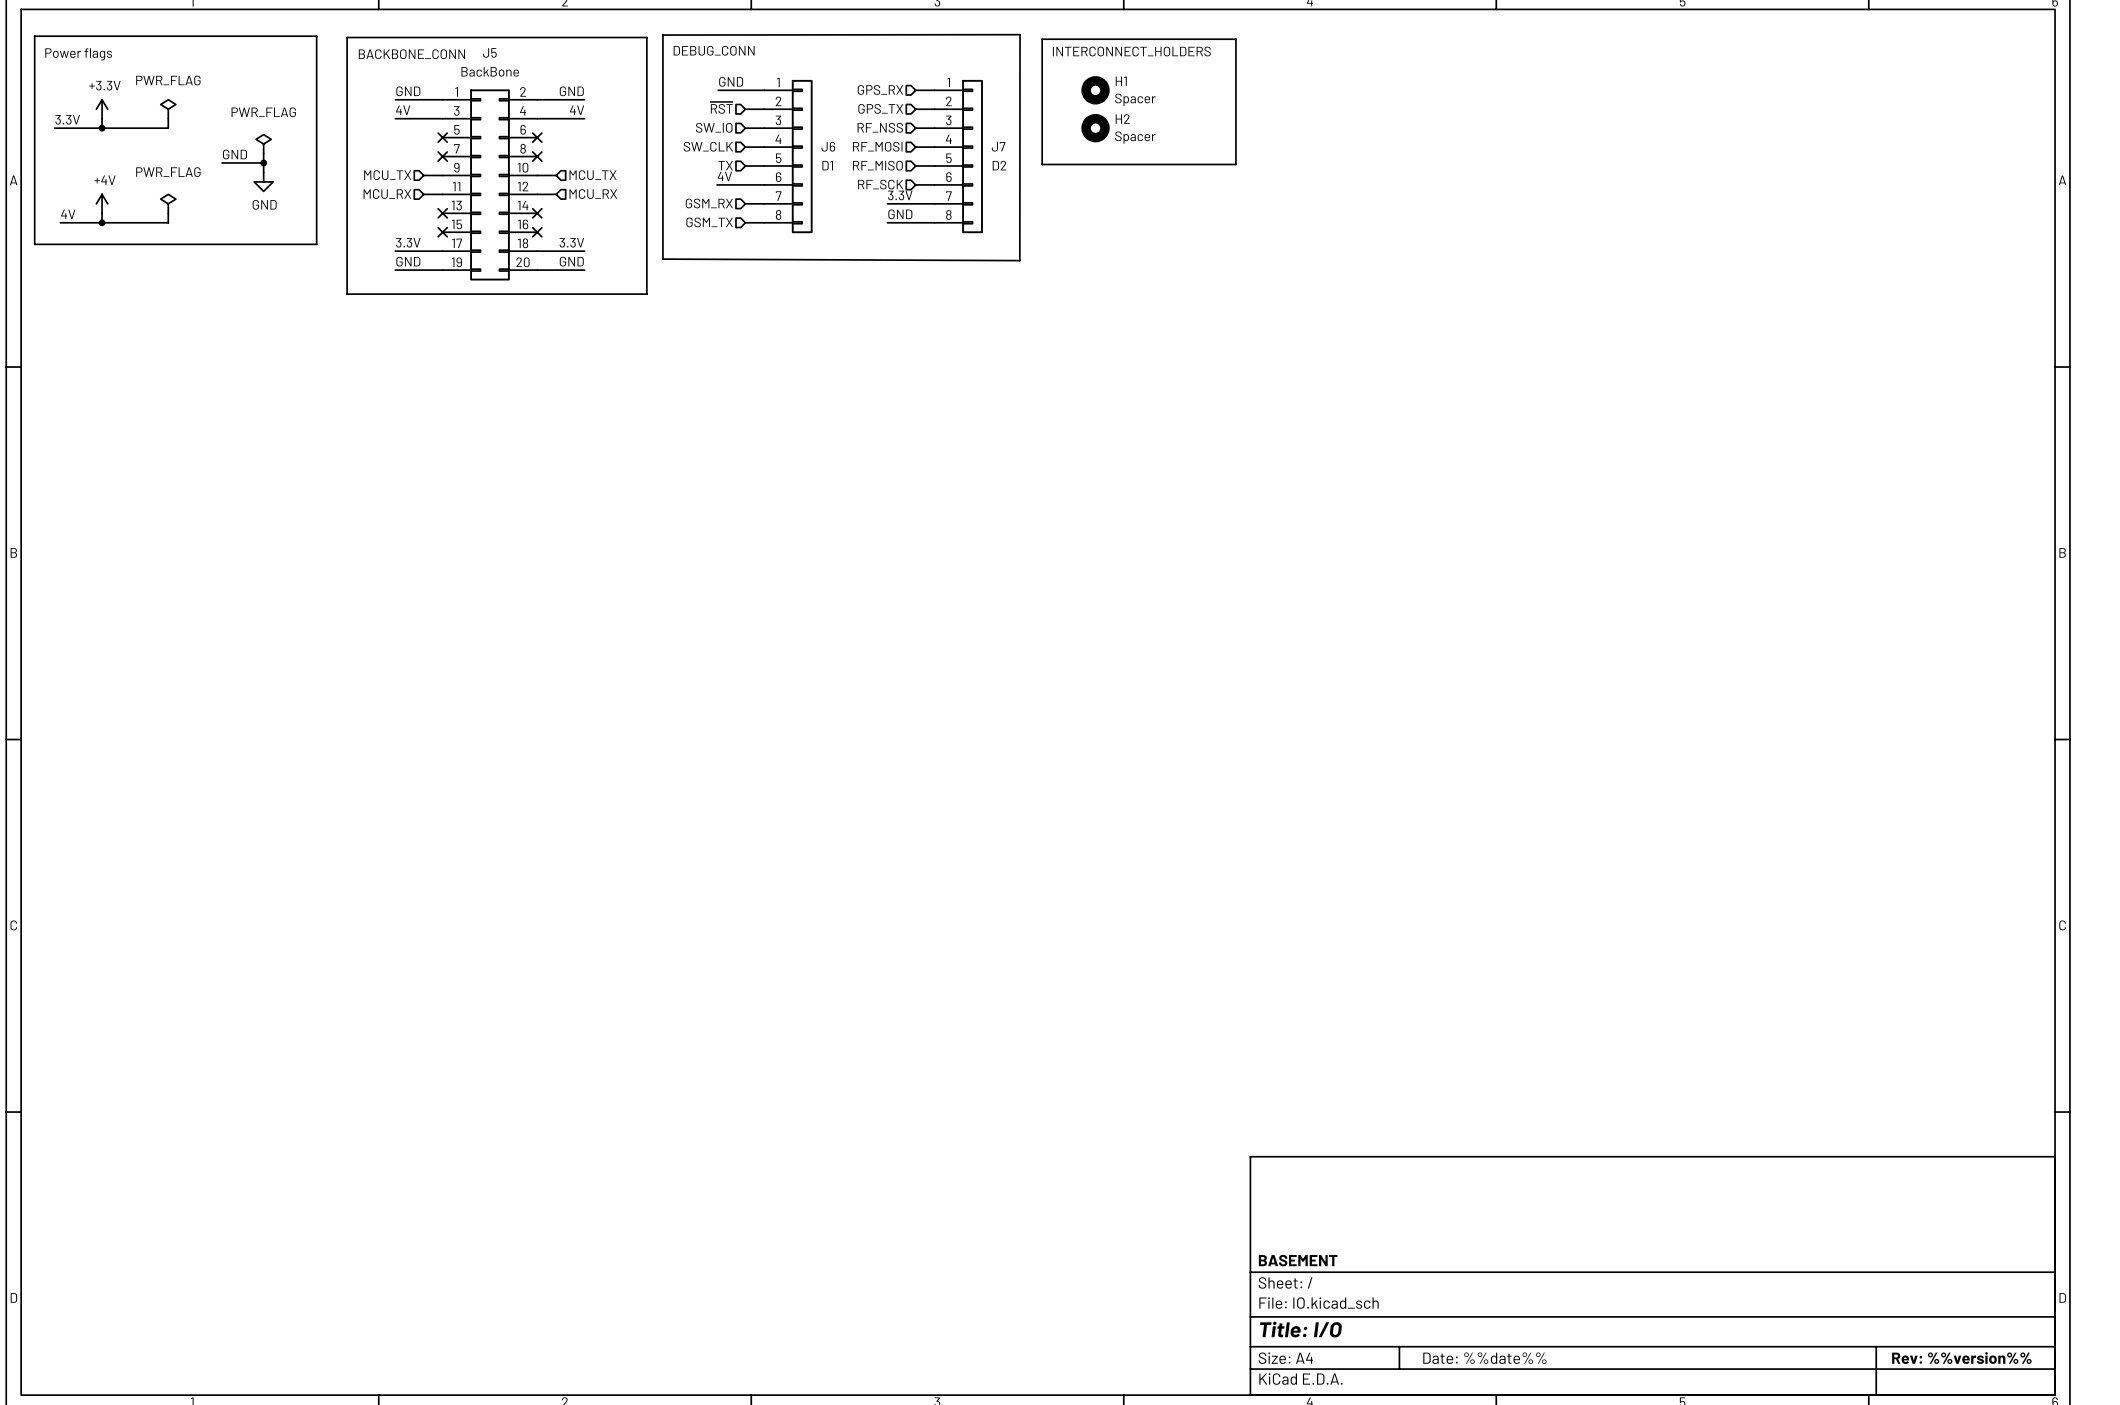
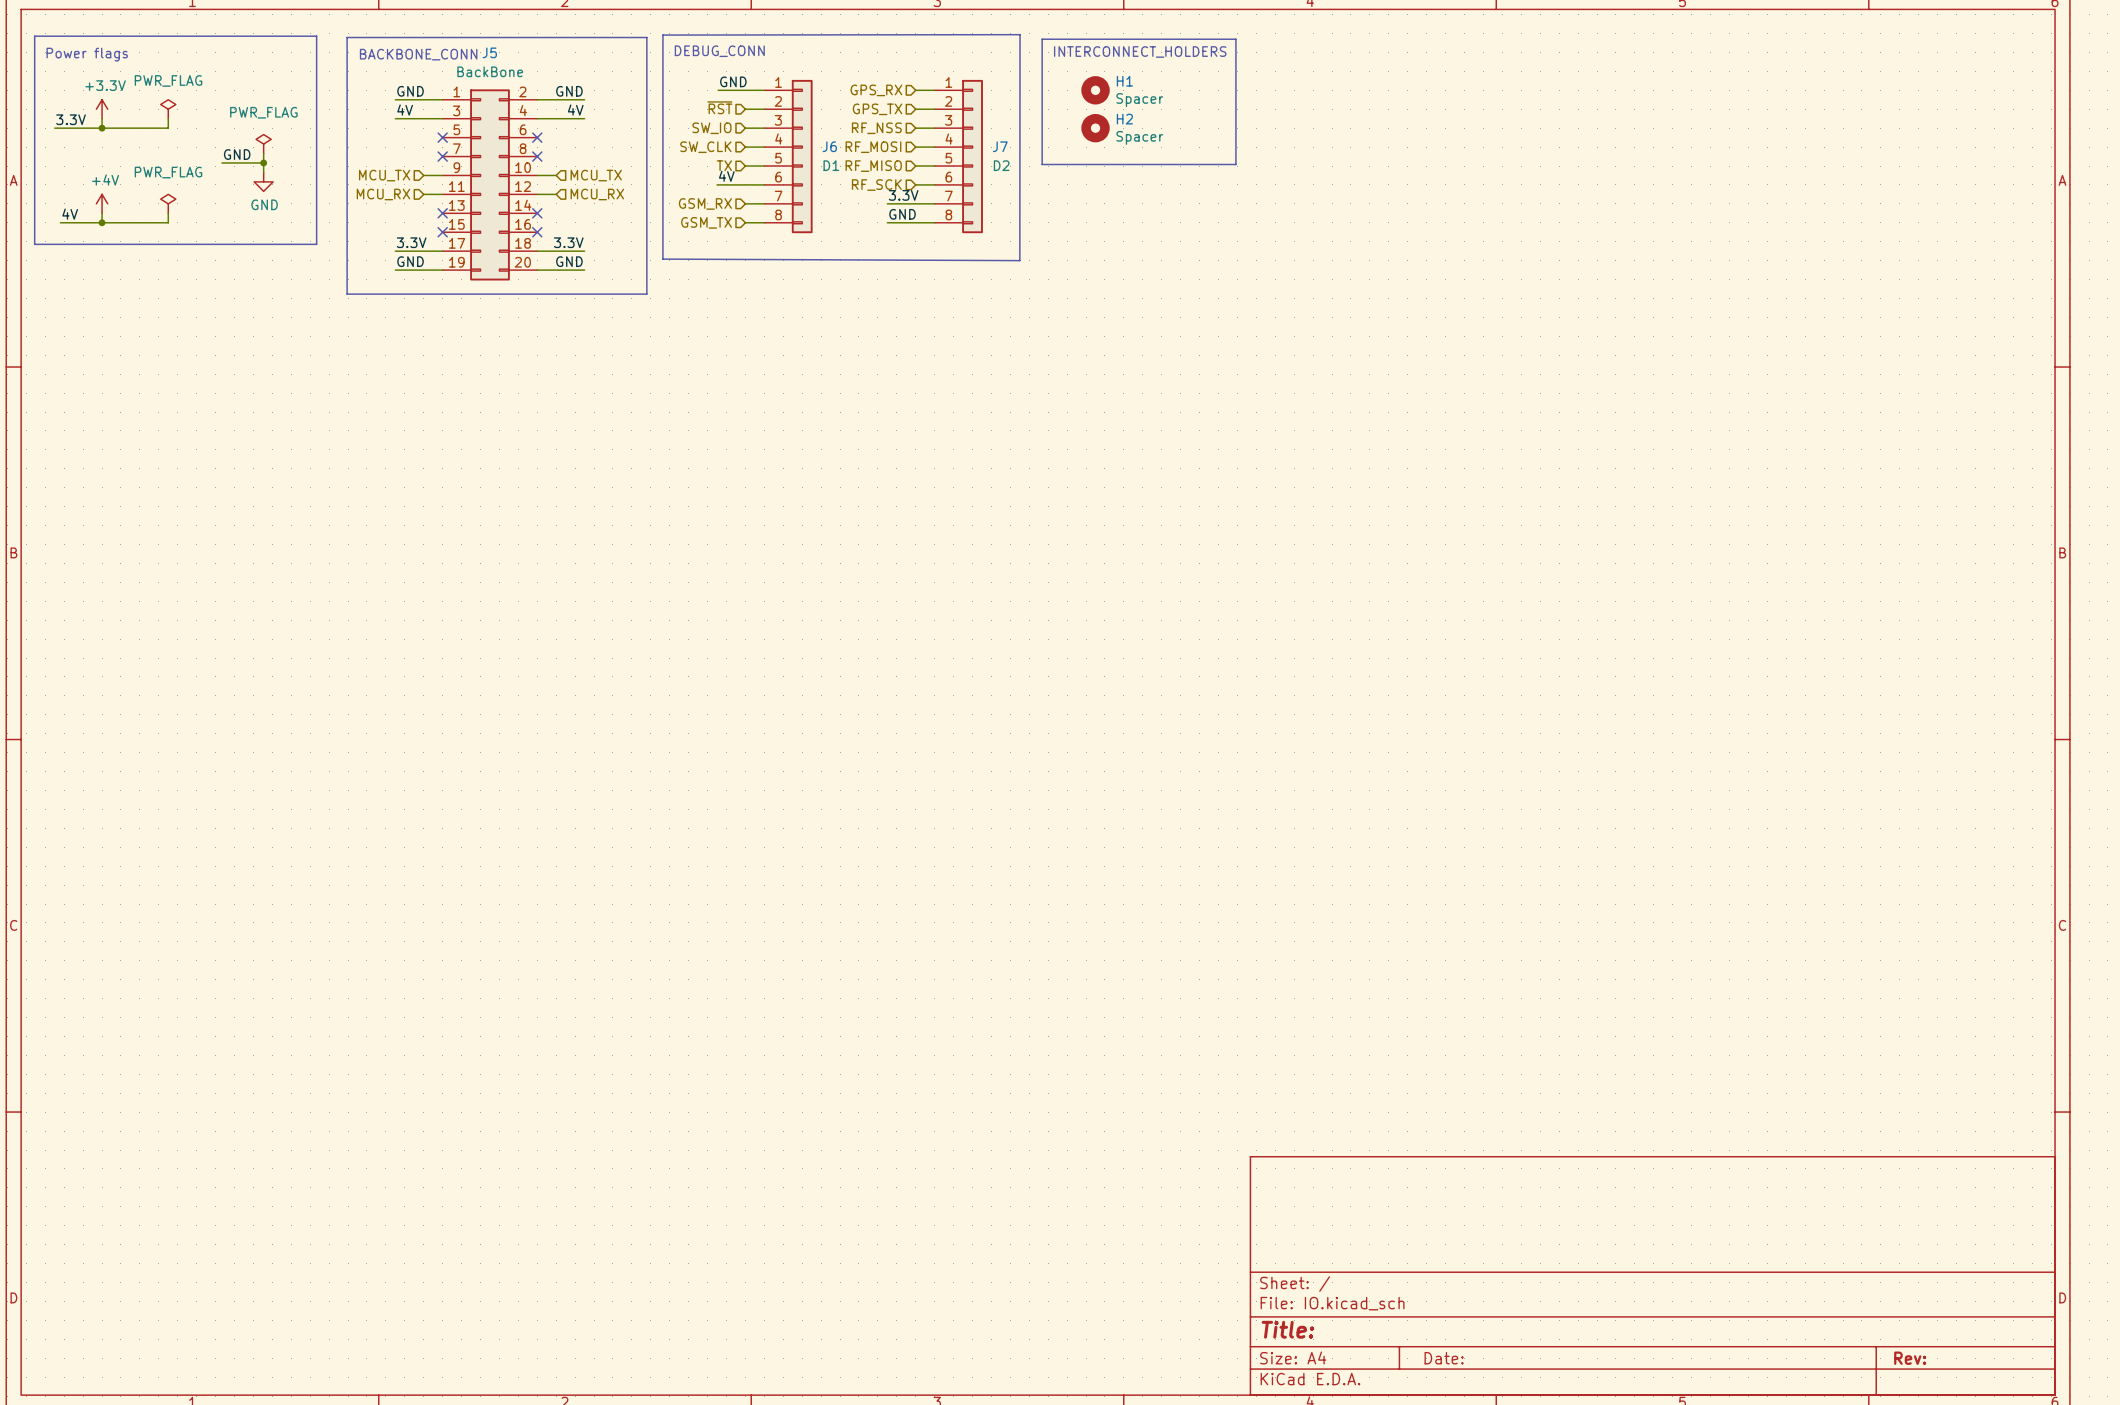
title block: BASEMENT (1298, 1260) -> none
title block: Title: I/O (1300, 1329) -> Title: (1287, 1329)
title block: Date: %%date%% (1484, 1358) -> Date: (1444, 1358)
title block: Rev: %%version%% (1961, 1358) -> Rev: (1910, 1358)

